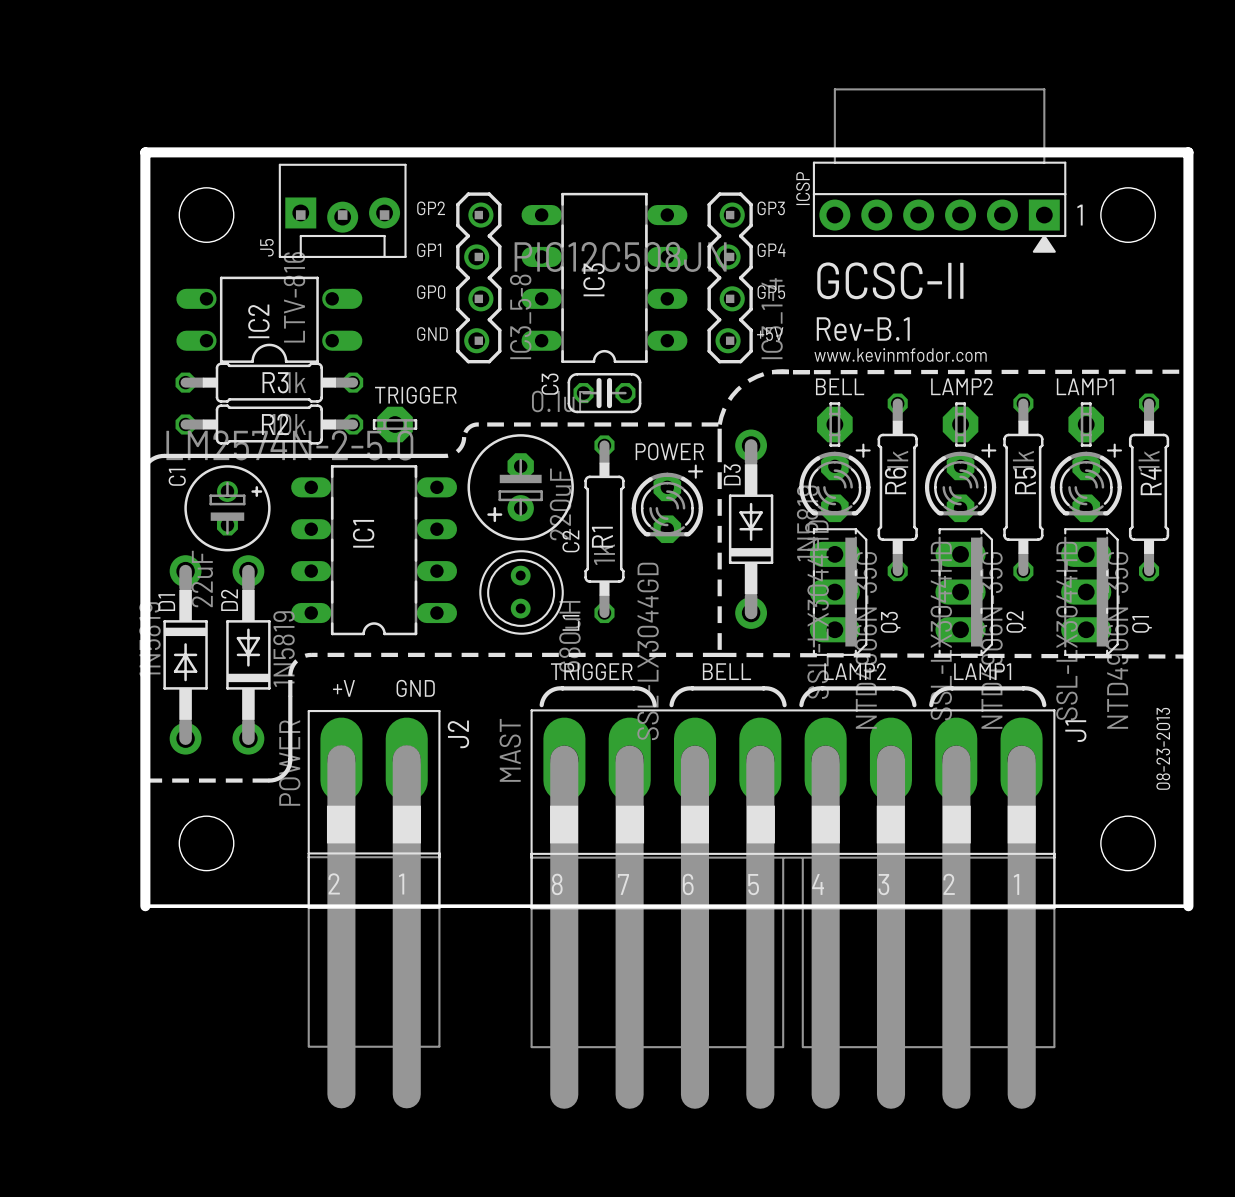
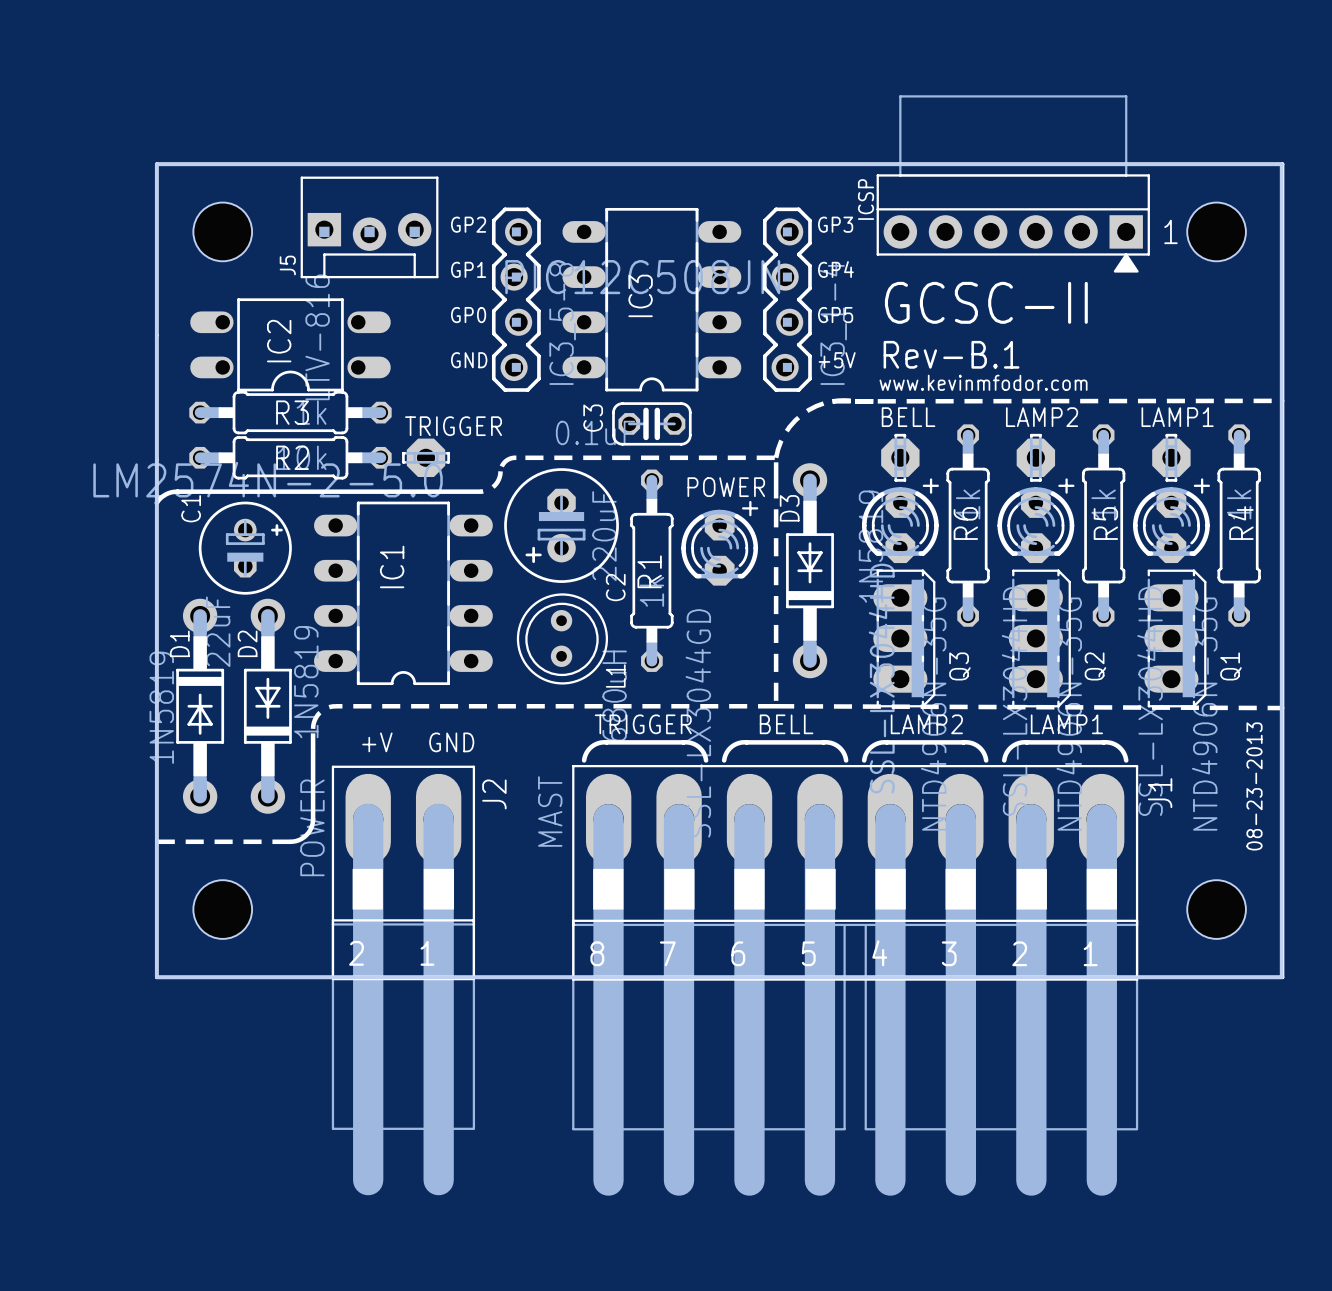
board edge width: thick (145, 906) (145, 152) (1188, 152) (1188, 906) -> thin (156, 977) (156, 164) (1281, 164) (1281, 977)

